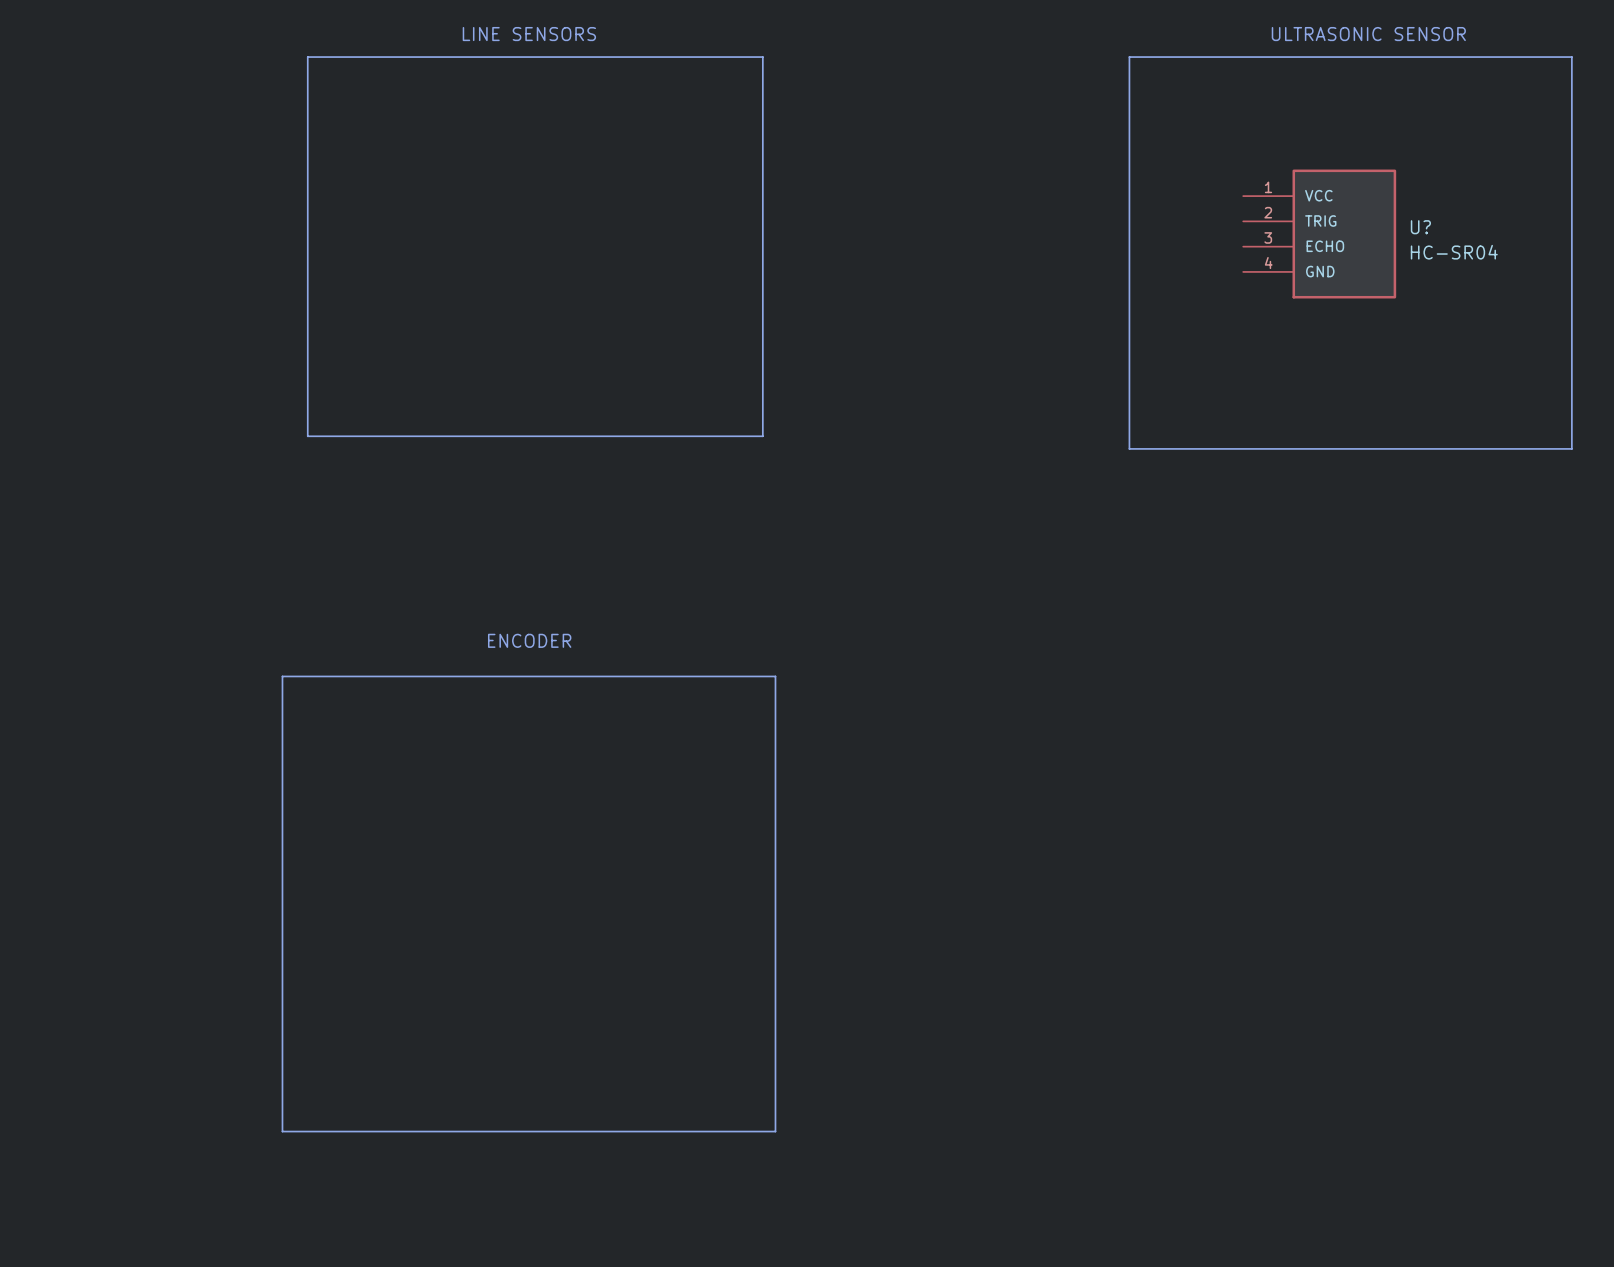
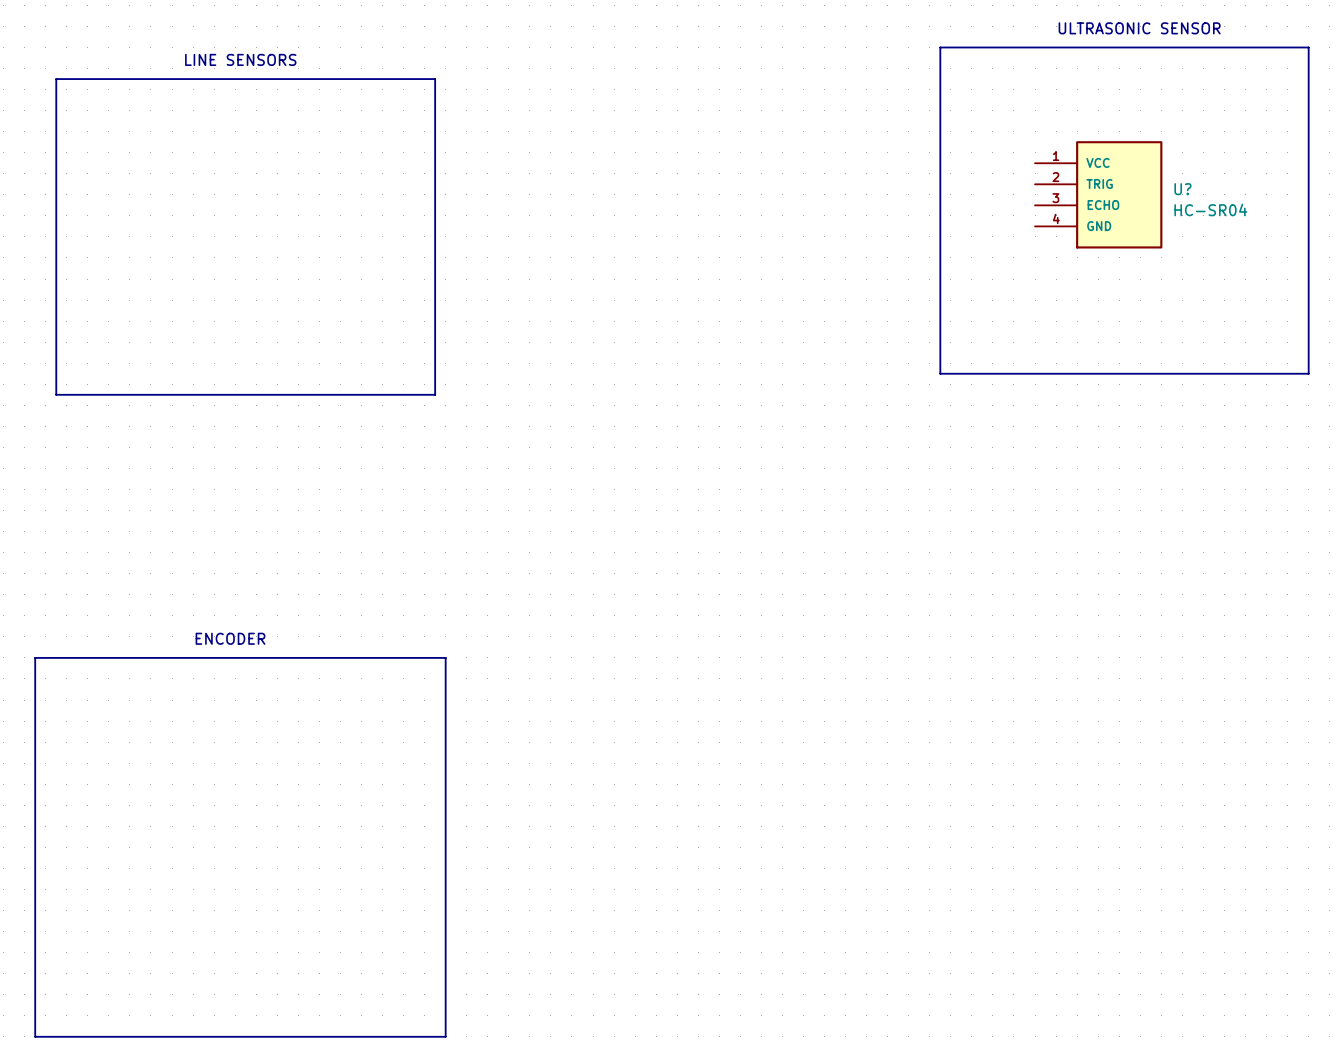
text position: LINE SENSORS (529, 34) -> LINE SENSORS (240, 59)
line: (307, 57) (762, 57) (762, 436) (307, 436) (307, 57) -> (56, 79) (435, 79) (435, 394) (56, 394) (56, 79)
text: ENCODER (529, 640) -> none
line: (282, 676) (775, 676) (775, 1131) (282, 1131) (282, 676) -> none
text: none -> ENCODER (230, 638)
line: none -> (35, 657) (445, 657) (445, 1036) (35, 1036) (35, 657)

